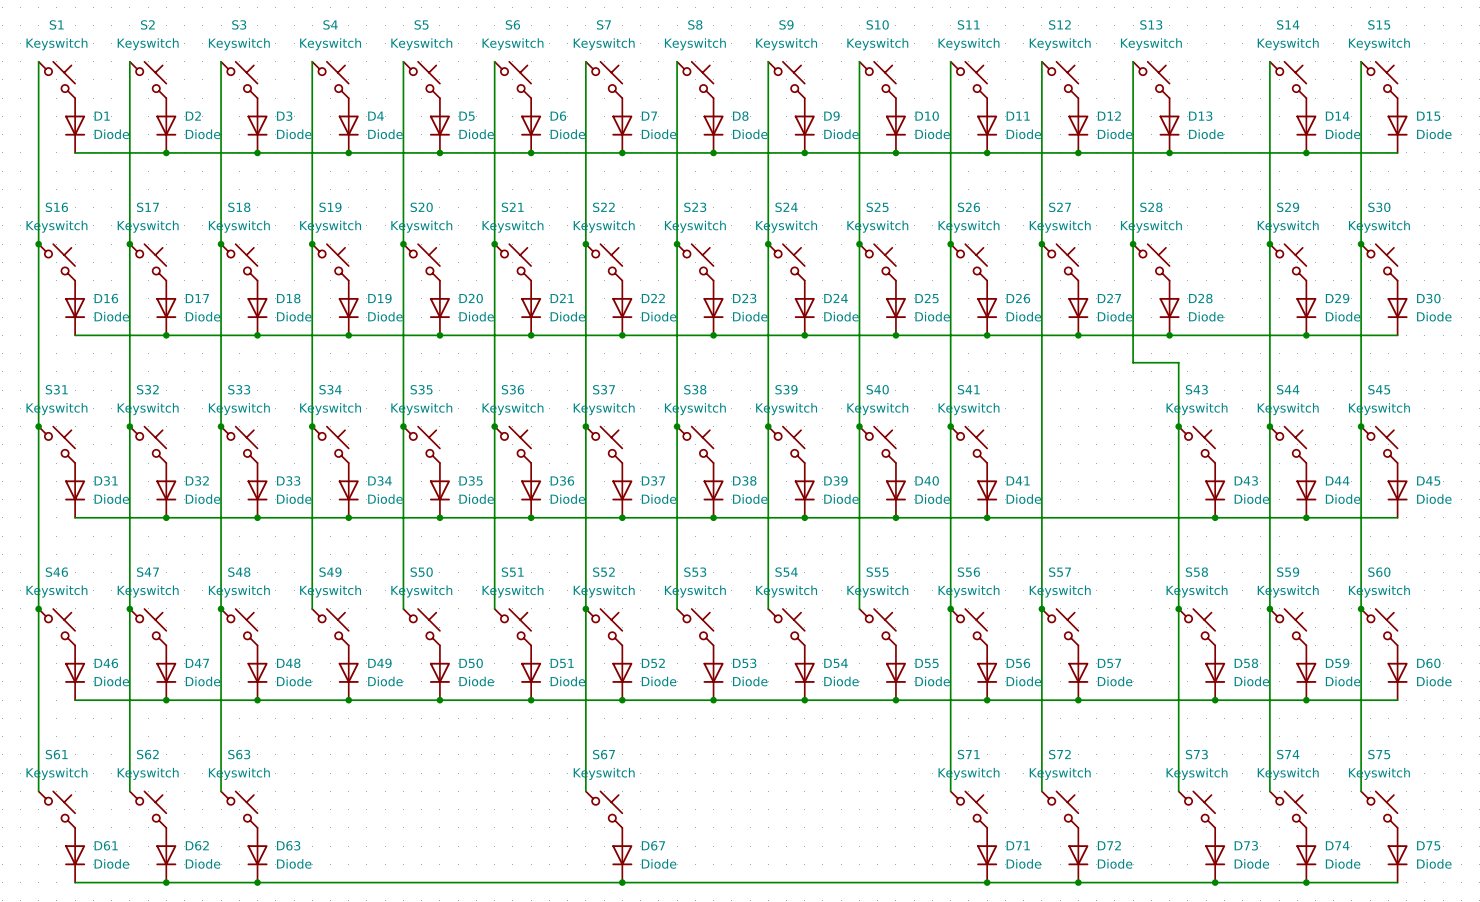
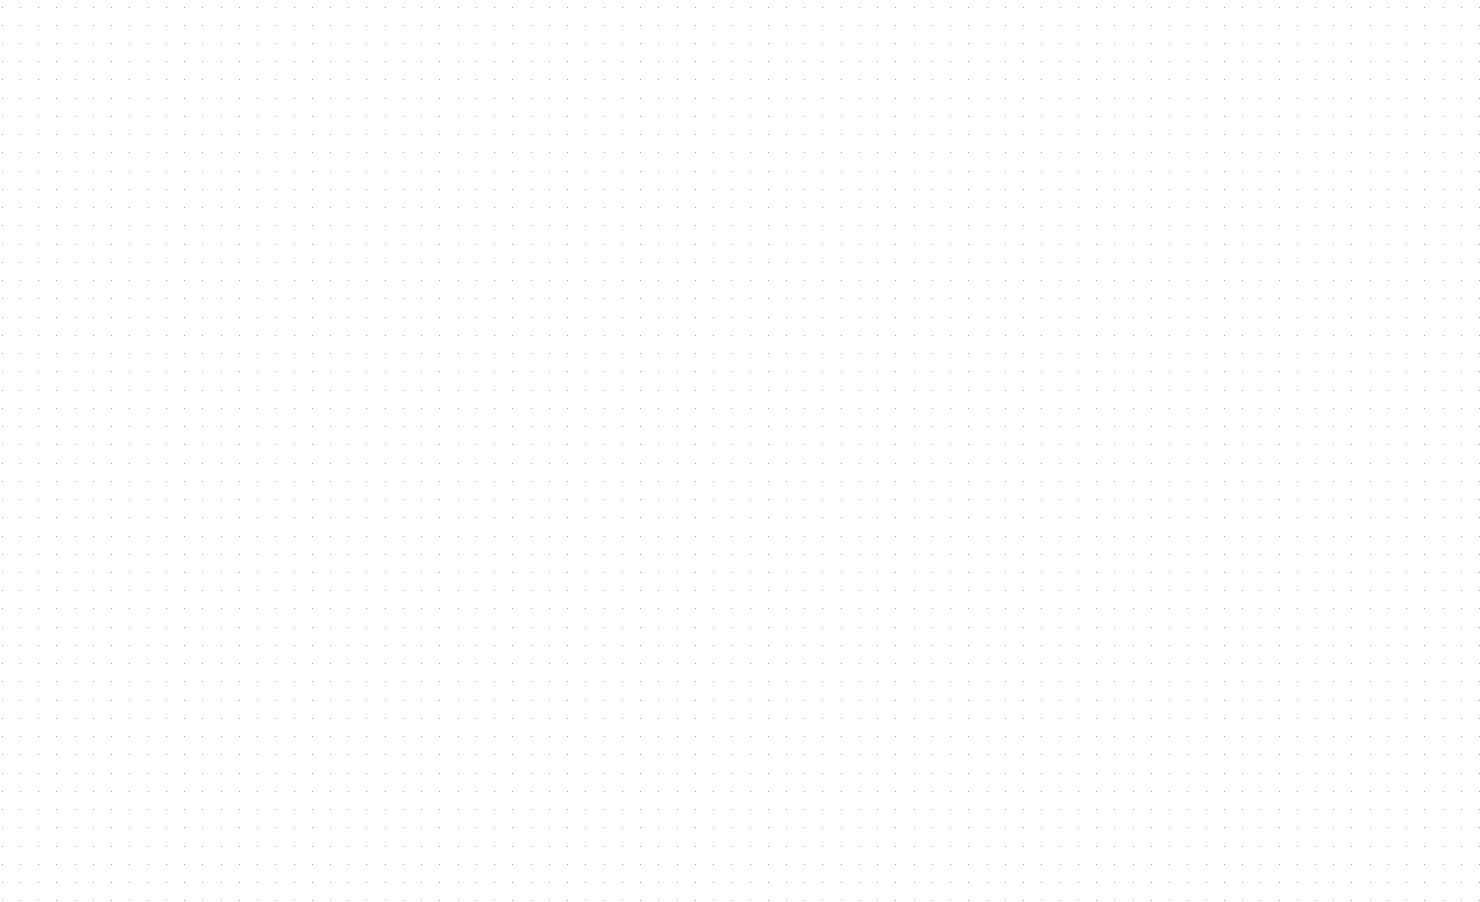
wire: (38, 61) (38, 791) -> none
wire: (129, 61) (129, 791) -> none
wire: (221, 61) (221, 791) -> none
wire: (312, 61) (312, 608) -> none
wire: (403, 61) (403, 608) -> none
wire: (494, 61) (494, 608) -> none
wire: (585, 61) (585, 791) -> none
wire: (677, 61) (677, 608) -> none
wire: (768, 61) (768, 608) -> none
wire: (859, 61) (859, 608) -> none
wire: (950, 61) (950, 791) -> none
wire: (1041, 61) (1041, 791) -> none
wire: (1133, 61) (1133, 362) (1178, 362) (1178, 791) -> none
wire: (1269, 61) (1269, 791) -> none
wire: (1361, 61) (1361, 791) -> none
S1: Keyswitch (56, 79) -> none
S2: Keyswitch (148, 79) -> none
S3: Keyswitch (239, 79) -> none
S4: Keyswitch (330, 79) -> none
S5: Keyswitch (421, 79) -> none
S6: Keyswitch (512, 79) -> none
S7: Keyswitch (604, 79) -> none
S8: Keyswitch (695, 79) -> none
S9: Keyswitch (786, 79) -> none
S10: Keyswitch (877, 79) -> none
S11: Keyswitch (968, 79) -> none
S12: Keyswitch (1060, 79) -> none
S13: Keyswitch (1151, 79) -> none
S14: Keyswitch (1288, 79) -> none
S15: Keyswitch (1379, 79) -> none
D1: Diode (75, 125) -> none
D2: Diode (166, 125) -> none
D3: Diode (257, 125) -> none
D4: Diode (348, 125) -> none
D5: Diode (439, 125) -> none
D6: Diode (531, 125) -> none
D7: Diode (622, 125) -> none
D8: Diode (713, 125) -> none
D9: Diode (804, 125) -> none
D10: Diode (895, 125) -> none
D11: Diode (987, 125) -> none
D12: Diode (1078, 125) -> none
D13: Diode (1169, 125) -> none
D14: Diode (1306, 125) -> none
D15: Diode (1397, 125) -> none
wire: (75, 152) (1397, 152) -> none
junction: (166, 152) -> none
junction: (257, 152) -> none
junction: (348, 152) -> none
junction: (439, 152) -> none
junction: (531, 152) -> none
junction: (622, 152) -> none
junction: (713, 152) -> none
junction: (804, 152) -> none
junction: (895, 152) -> none
junction: (987, 152) -> none
junction: (1078, 152) -> none
junction: (1169, 152) -> none
junction: (1306, 152) -> none
junction: (38, 244) -> none
junction: (129, 244) -> none
junction: (221, 244) -> none
junction: (312, 244) -> none
junction: (403, 244) -> none
junction: (494, 244) -> none
junction: (585, 244) -> none
junction: (677, 244) -> none
junction: (768, 244) -> none
junction: (859, 244) -> none
junction: (950, 244) -> none
junction: (1041, 244) -> none
junction: (1133, 244) -> none
junction: (1269, 244) -> none
junction: (1361, 244) -> none
S16: Keyswitch (56, 262) -> none
S17: Keyswitch (148, 262) -> none
S18: Keyswitch (239, 262) -> none
S19: Keyswitch (330, 262) -> none
S20: Keyswitch (421, 262) -> none
S21: Keyswitch (512, 262) -> none
S22: Keyswitch (604, 262) -> none
S23: Keyswitch (695, 262) -> none
S24: Keyswitch (786, 262) -> none
S25: Keyswitch (877, 262) -> none
S26: Keyswitch (968, 262) -> none
S27: Keyswitch (1060, 262) -> none
S28: Keyswitch (1151, 262) -> none
S29: Keyswitch (1288, 262) -> none
S30: Keyswitch (1379, 262) -> none
D16: Diode (75, 308) -> none
D17: Diode (166, 308) -> none
D18: Diode (257, 308) -> none
D19: Diode (348, 308) -> none
D20: Diode (439, 308) -> none
D21: Diode (531, 308) -> none
D22: Diode (622, 308) -> none
D23: Diode (713, 308) -> none
D24: Diode (804, 308) -> none
D25: Diode (895, 308) -> none
D26: Diode (987, 308) -> none
D27: Diode (1078, 308) -> none
D28: Diode (1169, 308) -> none
D29: Diode (1306, 308) -> none
D30: Diode (1397, 308) -> none
wire: (75, 335) (1397, 335) -> none
junction: (166, 335) -> none
junction: (257, 335) -> none
junction: (348, 335) -> none
junction: (439, 335) -> none
junction: (531, 335) -> none
junction: (622, 335) -> none
junction: (713, 335) -> none
junction: (804, 335) -> none
junction: (895, 335) -> none
junction: (987, 335) -> none
junction: (1078, 335) -> none
junction: (1169, 335) -> none
junction: (1306, 335) -> none
junction: (38, 426) -> none
junction: (129, 426) -> none
junction: (221, 426) -> none
junction: (312, 426) -> none
junction: (403, 426) -> none
junction: (494, 426) -> none
junction: (585, 426) -> none
junction: (677, 426) -> none
junction: (768, 426) -> none
junction: (859, 426) -> none
junction: (950, 426) -> none
junction: (1178, 426) -> none
junction: (1269, 426) -> none
junction: (1361, 426) -> none
S31: Keyswitch (56, 444) -> none
S32: Keyswitch (148, 444) -> none
S33: Keyswitch (239, 444) -> none
S34: Keyswitch (330, 444) -> none
S35: Keyswitch (421, 444) -> none
S36: Keyswitch (512, 444) -> none
S37: Keyswitch (604, 444) -> none
S38: Keyswitch (695, 444) -> none
S39: Keyswitch (786, 444) -> none
S40: Keyswitch (877, 444) -> none
S41: Keyswitch (968, 444) -> none
S43: Keyswitch (1196, 444) -> none
S44: Keyswitch (1288, 444) -> none
S45: Keyswitch (1379, 444) -> none
D31: Diode (75, 490) -> none
D32: Diode (166, 490) -> none
D33: Diode (257, 490) -> none
D34: Diode (348, 490) -> none
D35: Diode (439, 490) -> none
D36: Diode (531, 490) -> none
D37: Diode (622, 490) -> none
D38: Diode (713, 490) -> none
D39: Diode (804, 490) -> none
D40: Diode (895, 490) -> none
D41: Diode (987, 490) -> none
D43: Diode (1215, 490) -> none
D44: Diode (1306, 490) -> none
D45: Diode (1397, 490) -> none
wire: (75, 517) (1397, 517) -> none
junction: (166, 517) -> none
junction: (257, 517) -> none
junction: (348, 517) -> none
junction: (439, 517) -> none
junction: (531, 517) -> none
junction: (622, 517) -> none
junction: (713, 517) -> none
junction: (804, 517) -> none
junction: (895, 517) -> none
junction: (987, 517) -> none
junction: (1215, 517) -> none
junction: (1306, 517) -> none
junction: (38, 608) -> none
junction: (129, 608) -> none
junction: (221, 608) -> none
junction: (585, 608) -> none
junction: (950, 608) -> none
junction: (1041, 608) -> none
junction: (1178, 608) -> none
junction: (1269, 608) -> none
junction: (1361, 608) -> none
S46: Keyswitch (56, 627) -> none
S47: Keyswitch (148, 627) -> none
S48: Keyswitch (239, 627) -> none
S49: Keyswitch (330, 627) -> none
S50: Keyswitch (421, 627) -> none
S51: Keyswitch (512, 627) -> none
S52: Keyswitch (604, 627) -> none
S53: Keyswitch (695, 627) -> none
S54: Keyswitch (786, 627) -> none
S55: Keyswitch (877, 627) -> none
S56: Keyswitch (968, 627) -> none
S57: Keyswitch (1060, 627) -> none
S58: Keyswitch (1196, 627) -> none
S59: Keyswitch (1288, 627) -> none
S60: Keyswitch (1379, 627) -> none
D46: Diode (75, 672) -> none
D47: Diode (166, 672) -> none
D48: Diode (257, 672) -> none
D49: Diode (348, 672) -> none
D50: Diode (439, 672) -> none
D51: Diode (531, 672) -> none
D52: Diode (622, 672) -> none
D53: Diode (713, 672) -> none
D54: Diode (804, 672) -> none
D55: Diode (895, 672) -> none
D56: Diode (987, 672) -> none
D57: Diode (1078, 672) -> none
D58: Diode (1215, 672) -> none
D59: Diode (1306, 672) -> none
D60: Diode (1397, 672) -> none
wire: (75, 700) (1397, 700) -> none
junction: (166, 700) -> none
junction: (257, 700) -> none
junction: (348, 700) -> none
junction: (439, 700) -> none
junction: (531, 700) -> none
junction: (622, 700) -> none
junction: (713, 700) -> none
junction: (804, 700) -> none
junction: (895, 700) -> none
junction: (987, 700) -> none
junction: (1078, 700) -> none
junction: (1215, 700) -> none
junction: (1306, 700) -> none
S61: Keyswitch (56, 809) -> none
S62: Keyswitch (148, 809) -> none
S63: Keyswitch (239, 809) -> none
S67: Keyswitch (604, 809) -> none
S71: Keyswitch (968, 809) -> none
S72: Keyswitch (1060, 809) -> none
S73: Keyswitch (1196, 809) -> none
S74: Keyswitch (1288, 809) -> none
S75: Keyswitch (1379, 809) -> none
D61: Diode (75, 855) -> none
D62: Diode (166, 855) -> none
D63: Diode (257, 855) -> none
D67: Diode (622, 855) -> none
D71: Diode (987, 855) -> none
D72: Diode (1078, 855) -> none
D73: Diode (1215, 855) -> none
D74: Diode (1306, 855) -> none
D75: Diode (1397, 855) -> none
wire: (75, 882) (1397, 882) -> none
junction: (166, 882) -> none
junction: (257, 882) -> none
junction: (622, 882) -> none
junction: (987, 882) -> none
junction: (1078, 882) -> none
junction: (1215, 882) -> none
junction: (1306, 882) -> none

